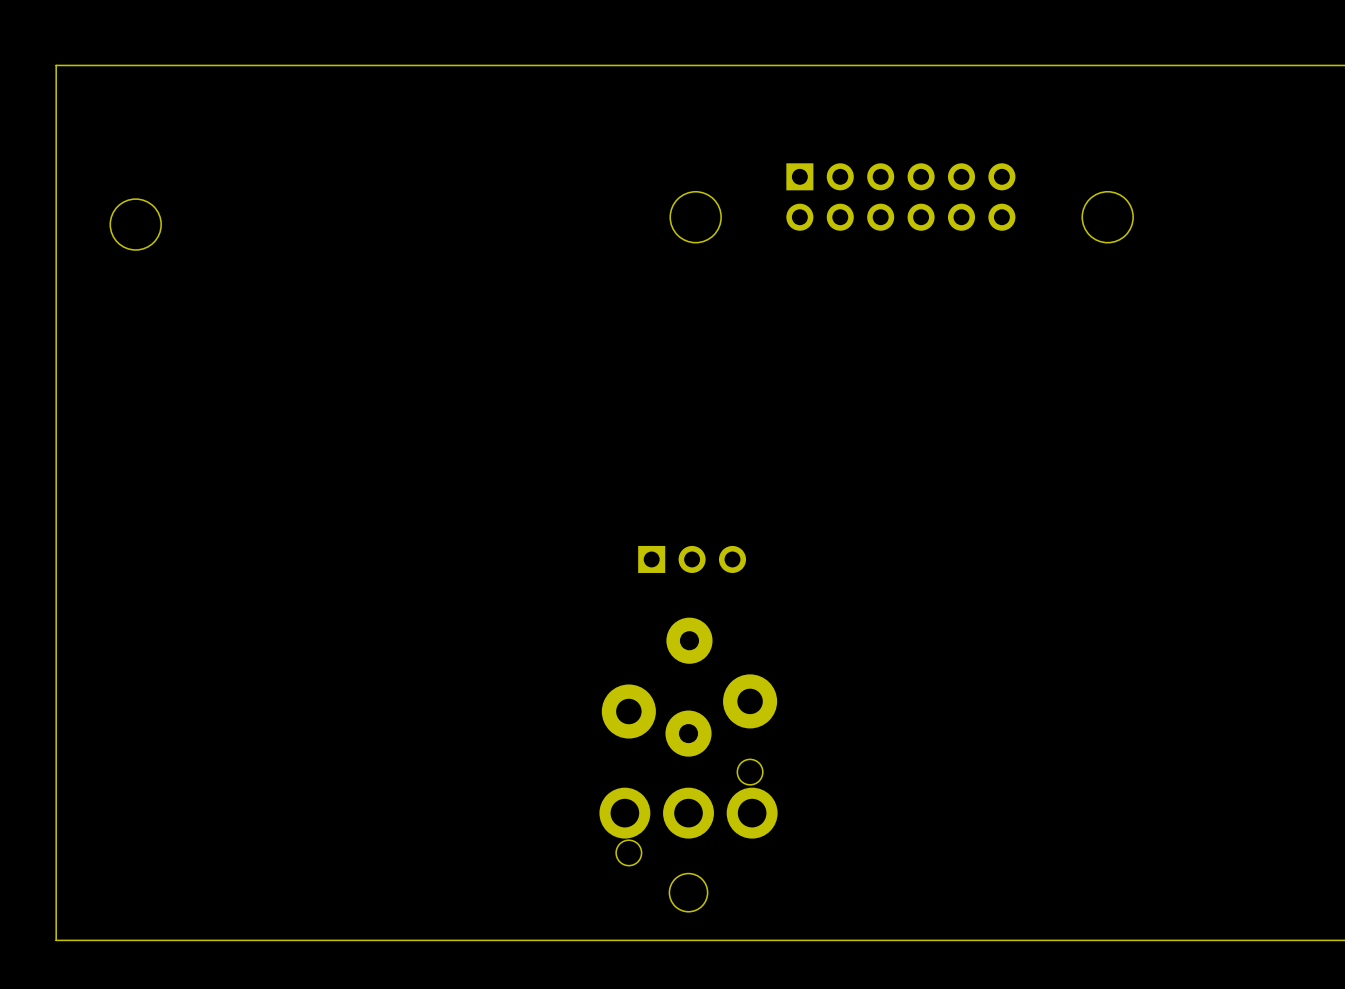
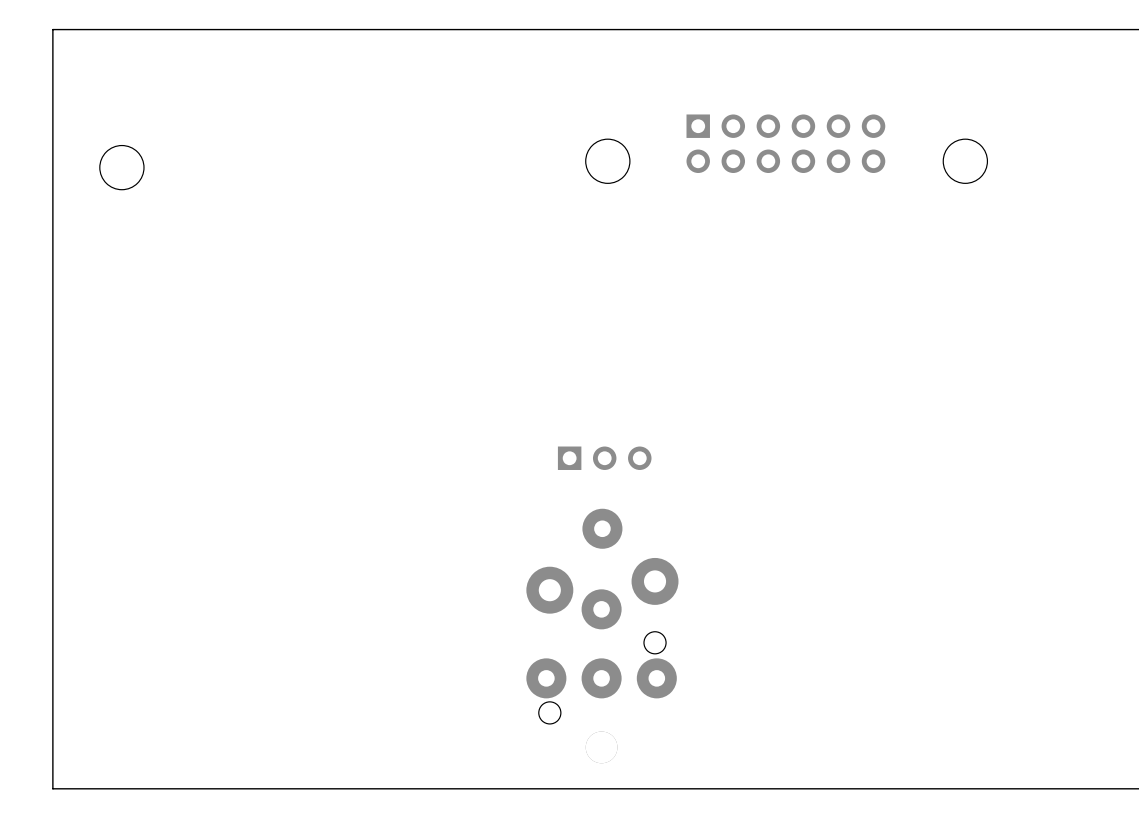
part footprint: [599, 710, 778, 912] -> [526, 589, 677, 764]

